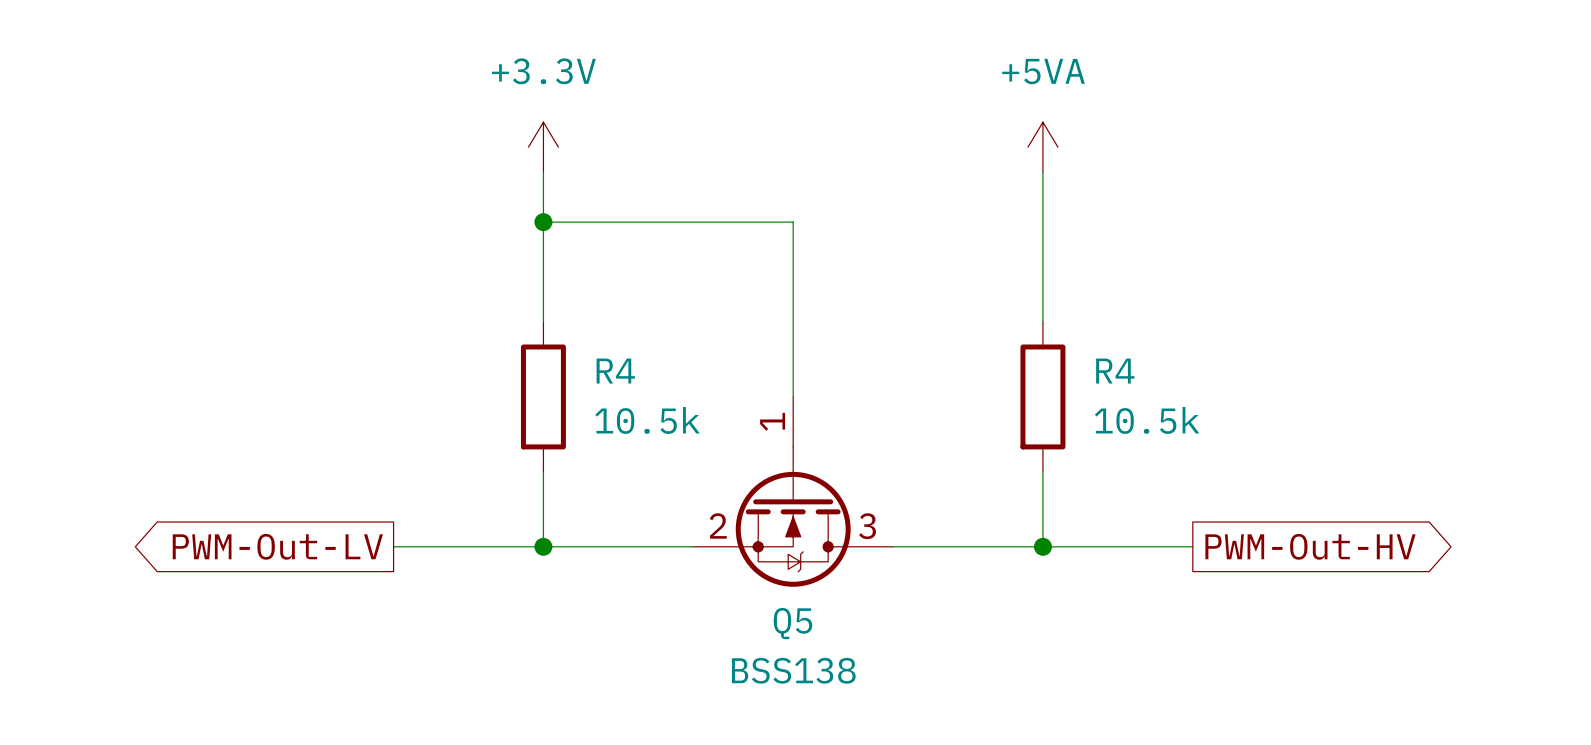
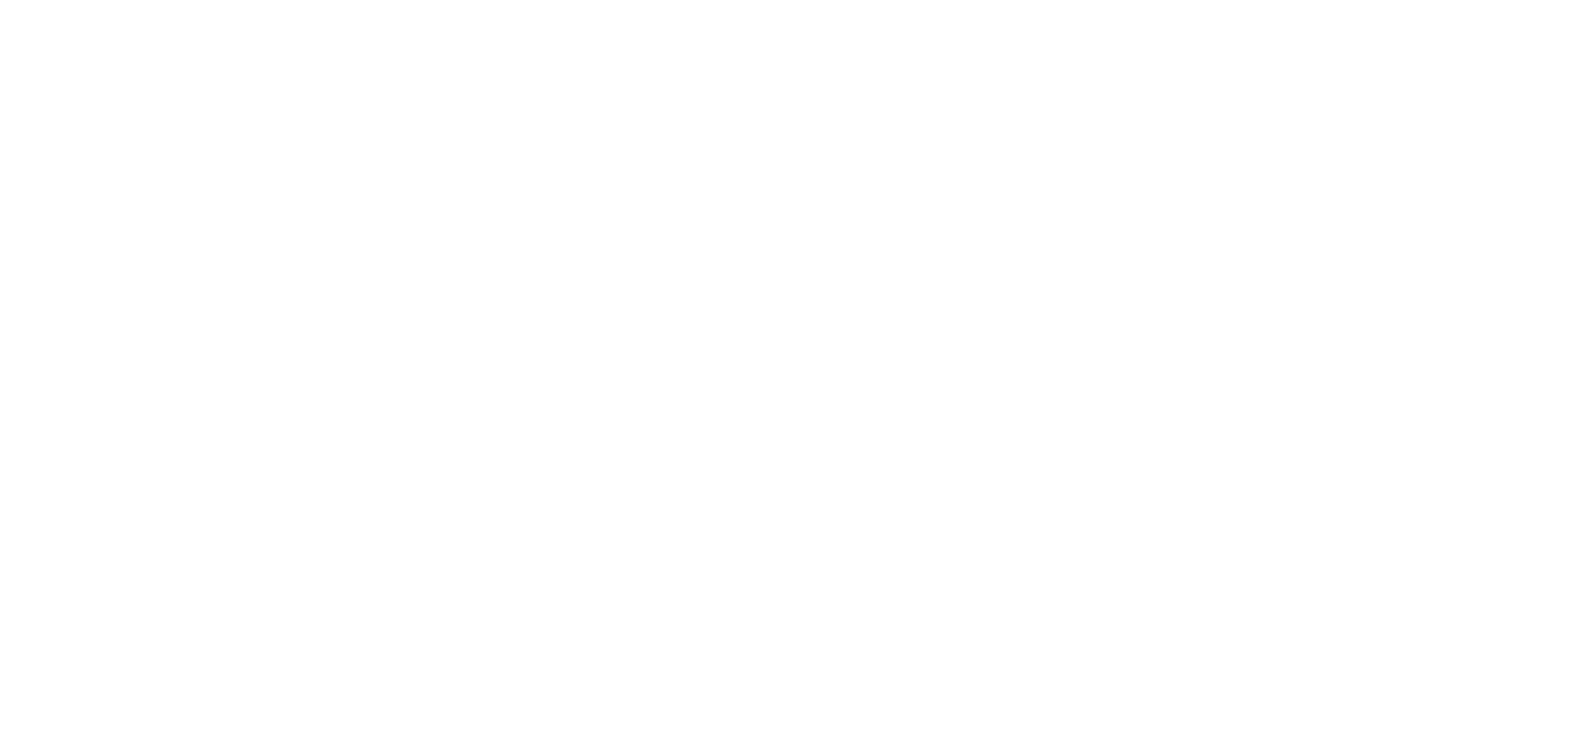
power symbol: +3.3V (543, 147) -> none
power symbol: +5VA (1042, 147) -> none
wire: (543, 172) (543, 322) -> none
wire: (1042, 172) (1042, 322) -> none
wire: (543, 222) (793, 222) (793, 396) -> none
junction: (543, 222) -> none
R4: 10.5k (543, 396) -> none
R4: 10.5k (1042, 396) -> none
wire: (543, 471) (543, 546) -> none
wire: (1042, 471) (1042, 546) -> none
Q5: BSS138 (793, 491) -> none
global label: PWM-Out-LV (277, 546) -> none
wire: (393, 546) (693, 546) -> none
junction: (543, 546) -> none
wire: (893, 546) (1192, 546) -> none
junction: (1042, 546) -> none
global label: PWM-Out-HV (1310, 546) -> none

